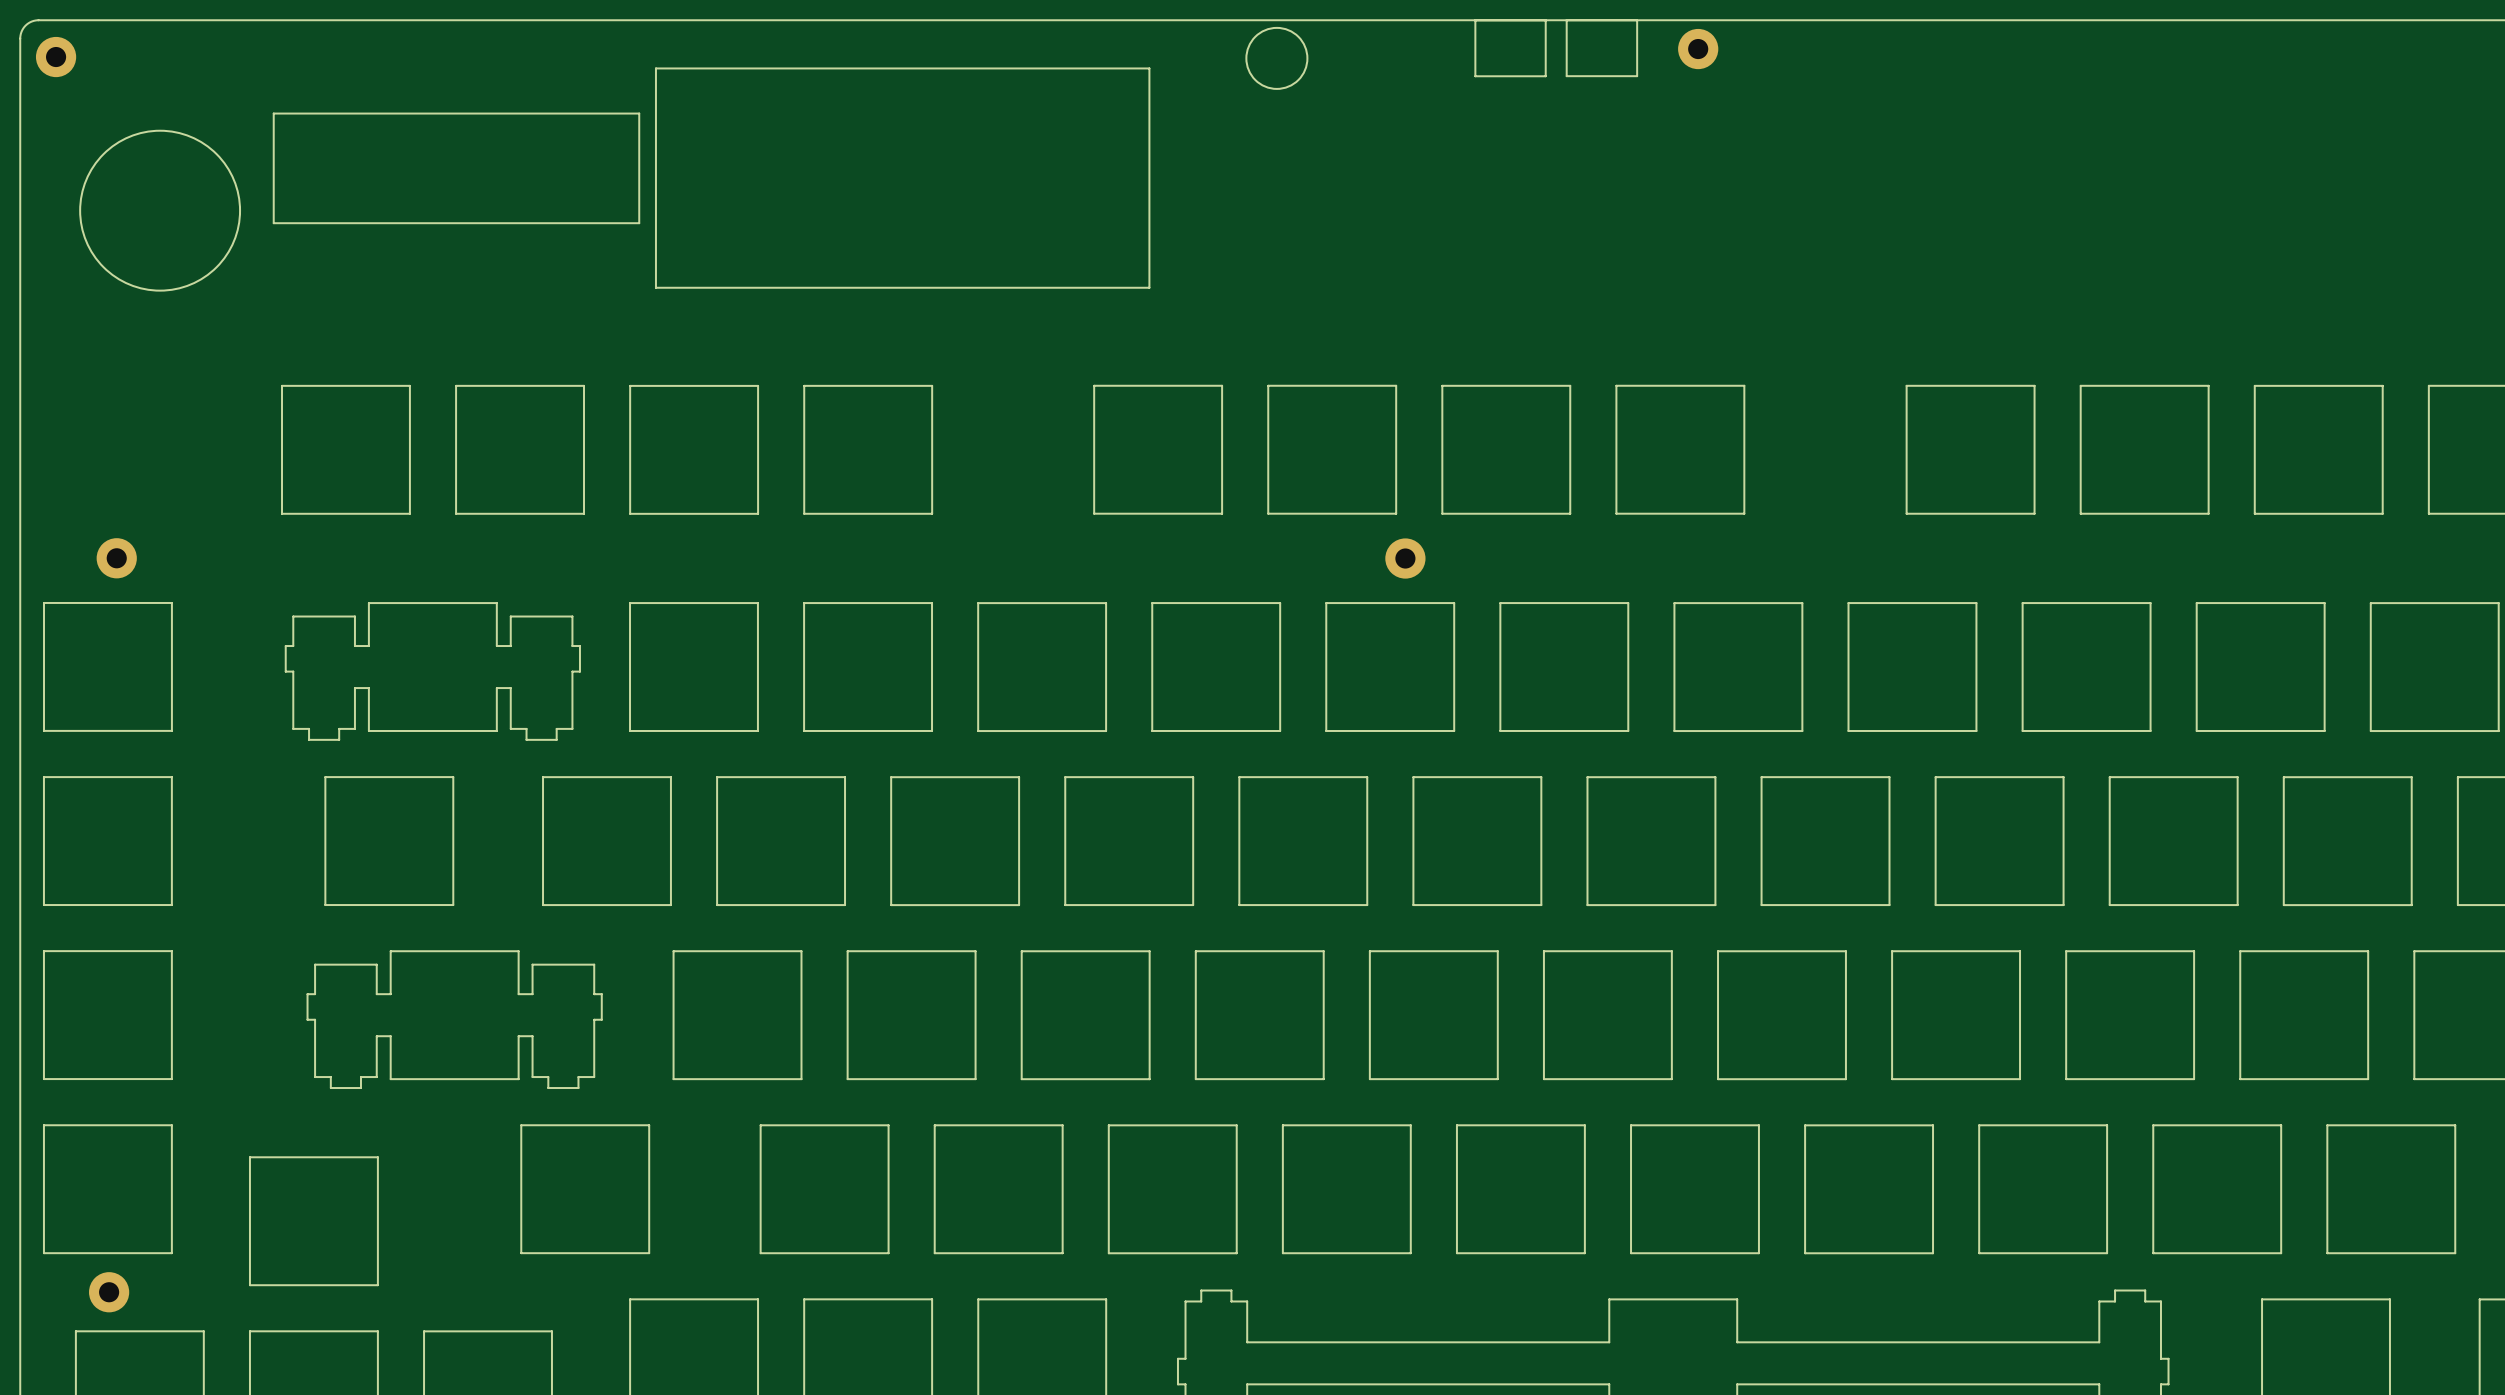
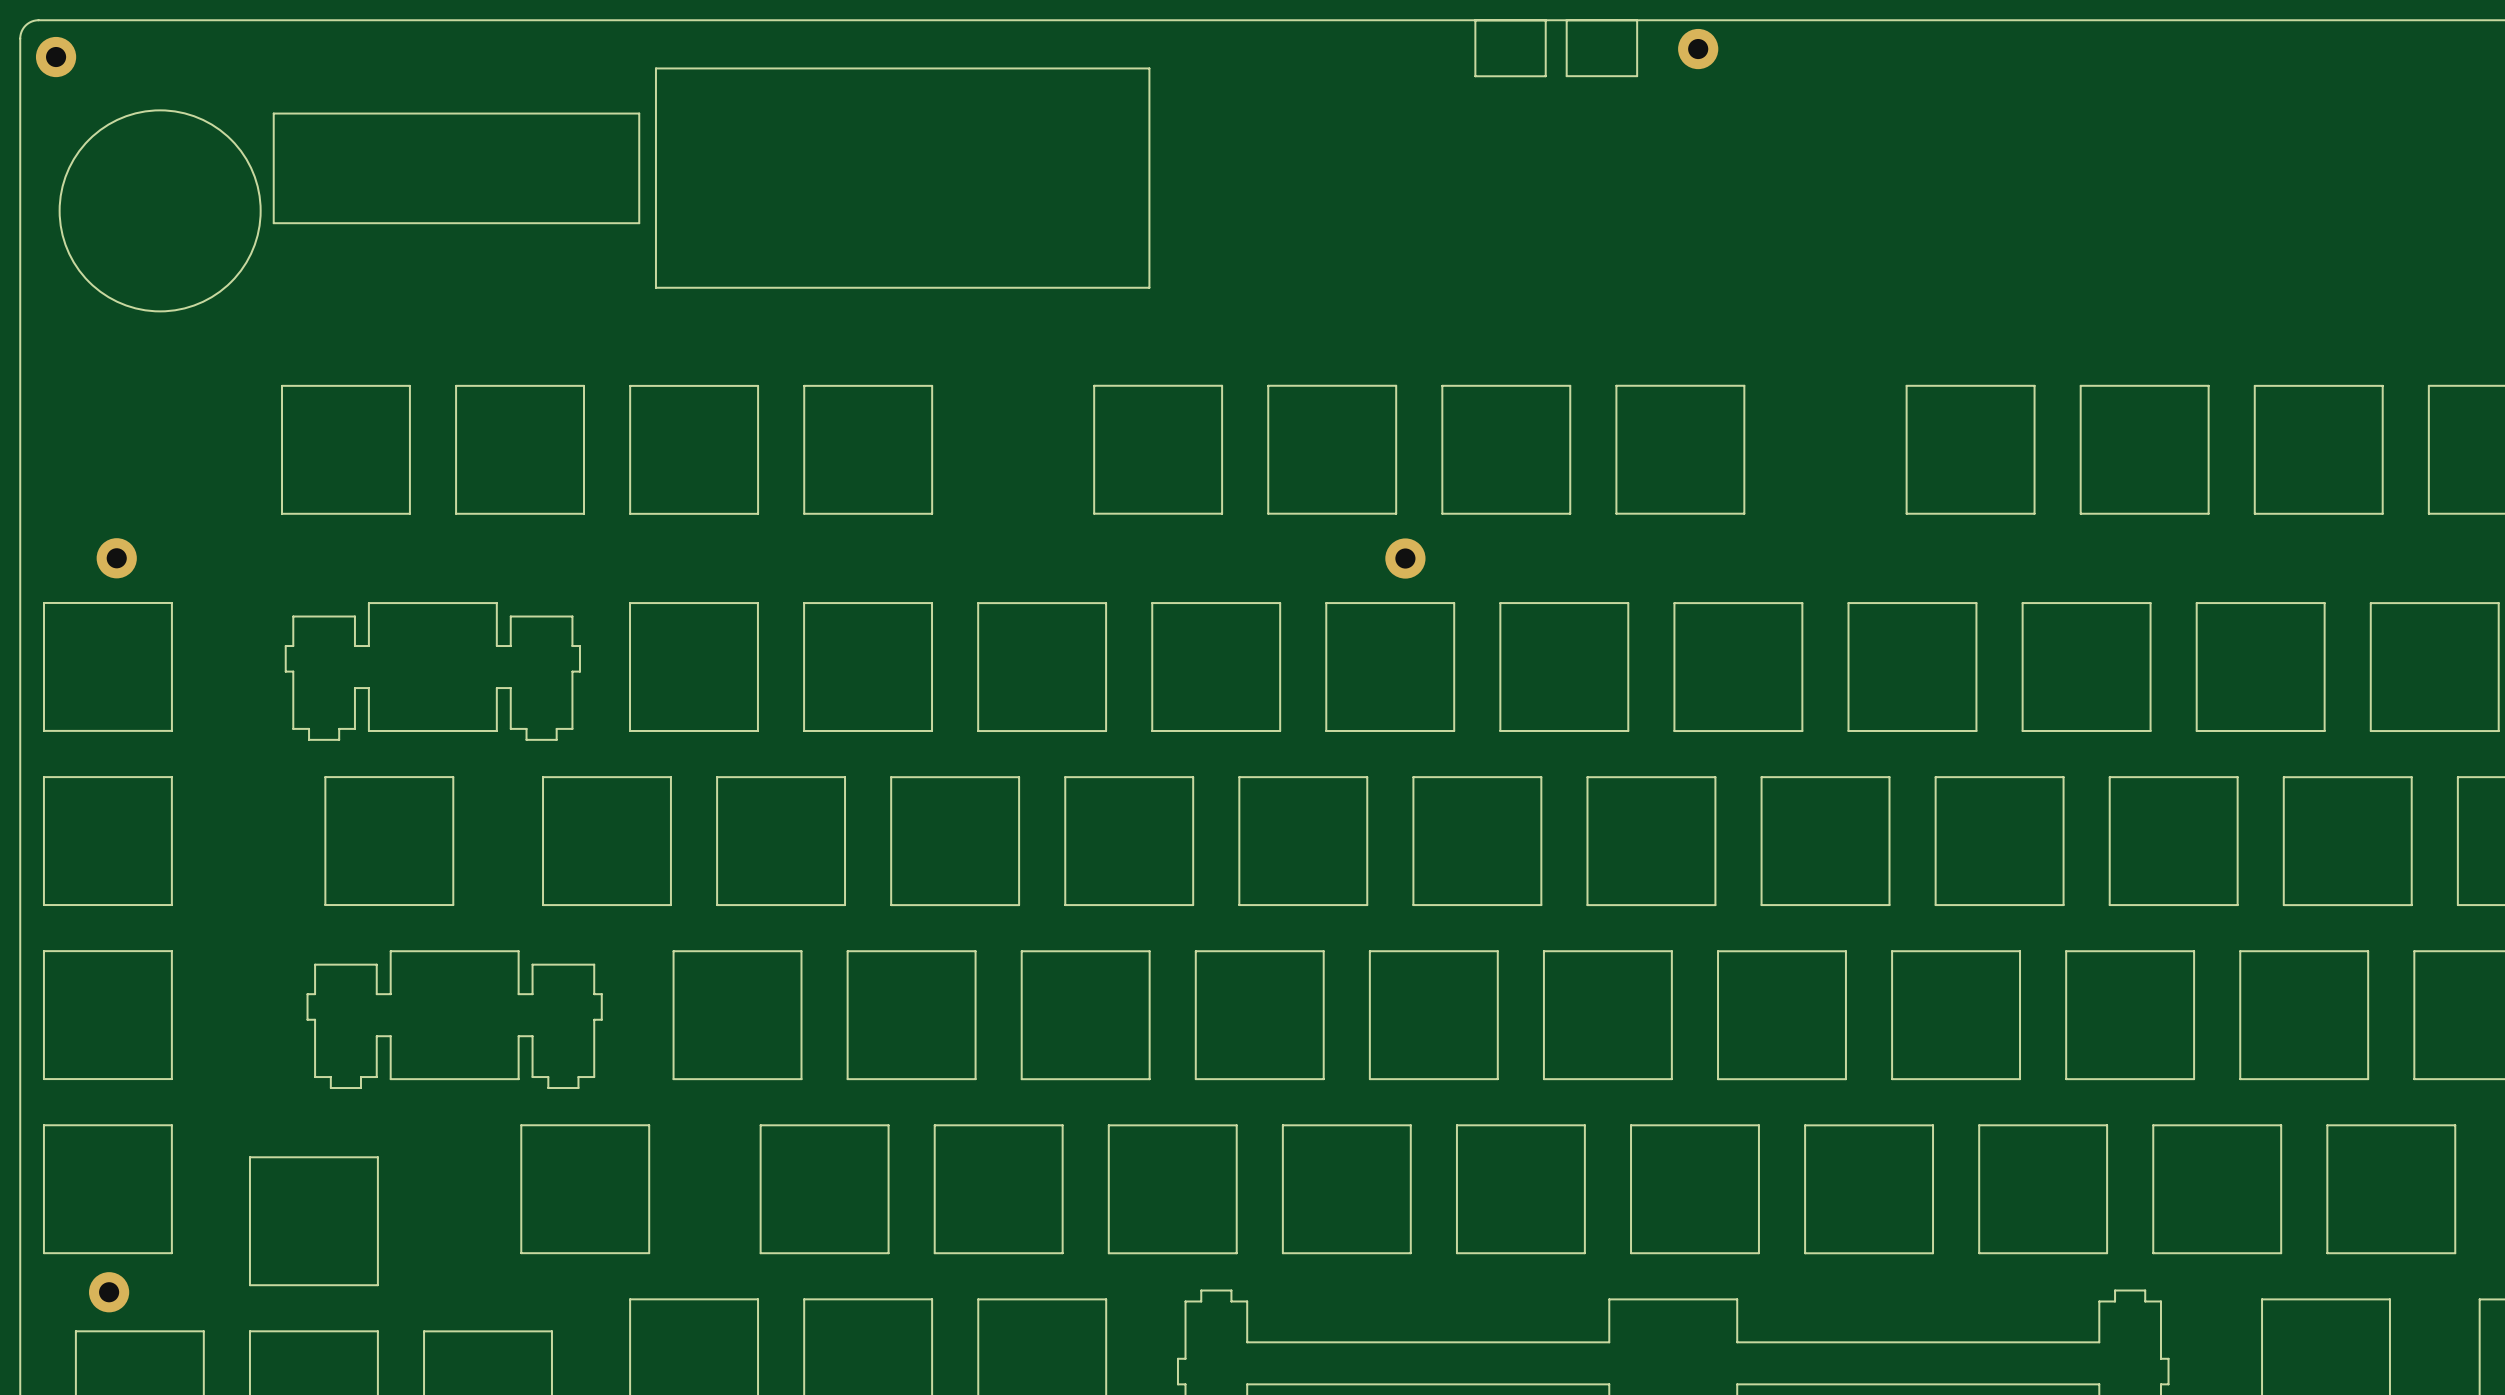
round board edge: [1245, 27, 1308, 90] -> none
round board edge size: [79, 130, 241, 292] -> [59, 109, 262, 312]

